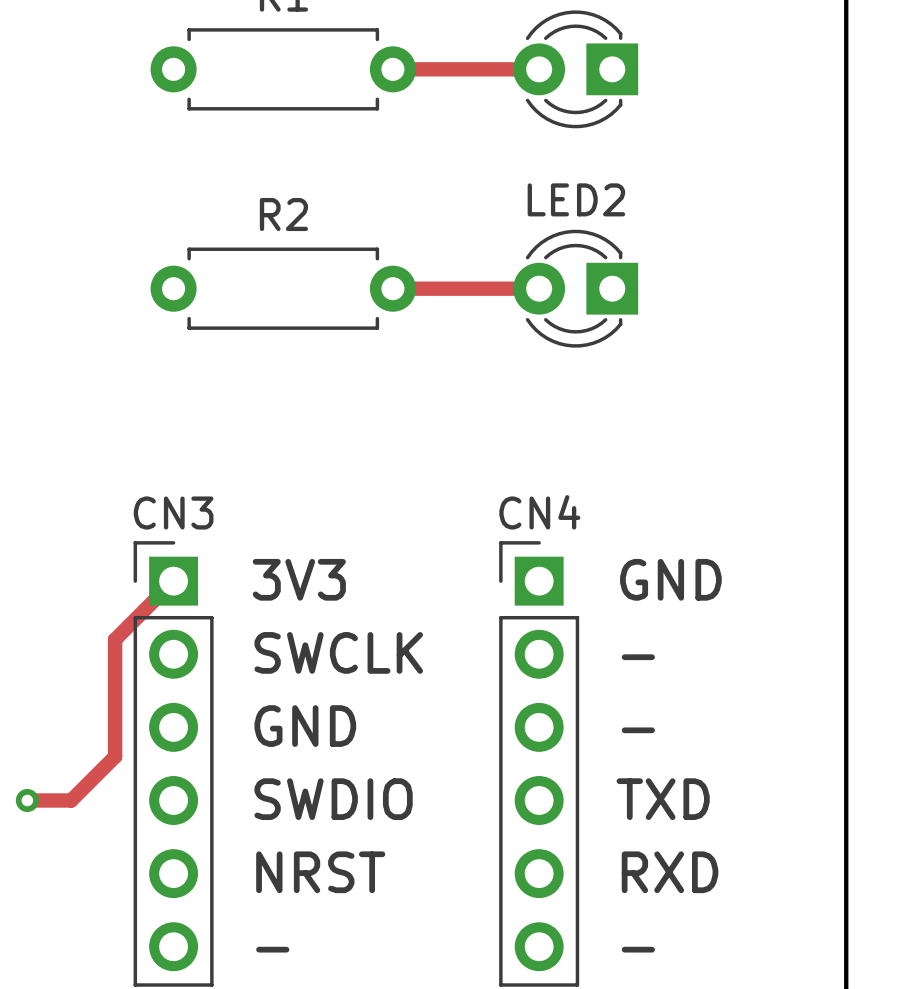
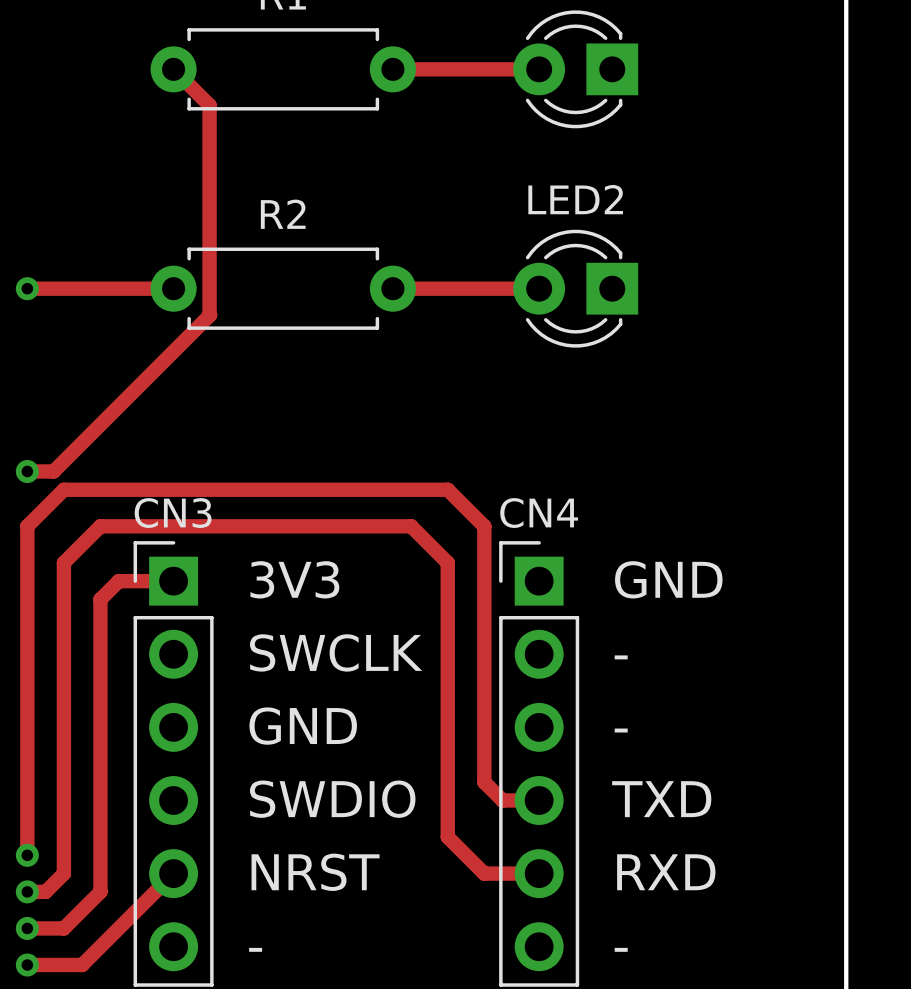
track: none -> (173, 69) (209, 105) (210, 315) (53, 471) (27, 471)
track: none -> (27, 288) (173, 288)
via: none -> (27, 288)
via: none -> (27, 471)
track: (173, 581) (115, 639) (115, 756) (71, 800) (27, 800) -> (173, 581) (118, 581) (100, 599) (100, 891) (63, 928) (27, 928)
via: (27, 800) -> none
track: none -> (539, 800) (502, 800) (484, 782) (484, 526) (447, 489) (63, 489) (27, 526) (27, 855)
via: none -> (27, 855)
track: none -> (173, 873) (82, 965) (27, 965)
track: none -> (539, 873) (484, 873) (447, 837) (447, 562) (411, 526) (100, 526) (63, 562) (63, 873) (45, 891) (27, 891)
via: none -> (27, 891)
via: none -> (27, 928)
via: none -> (27, 965)

